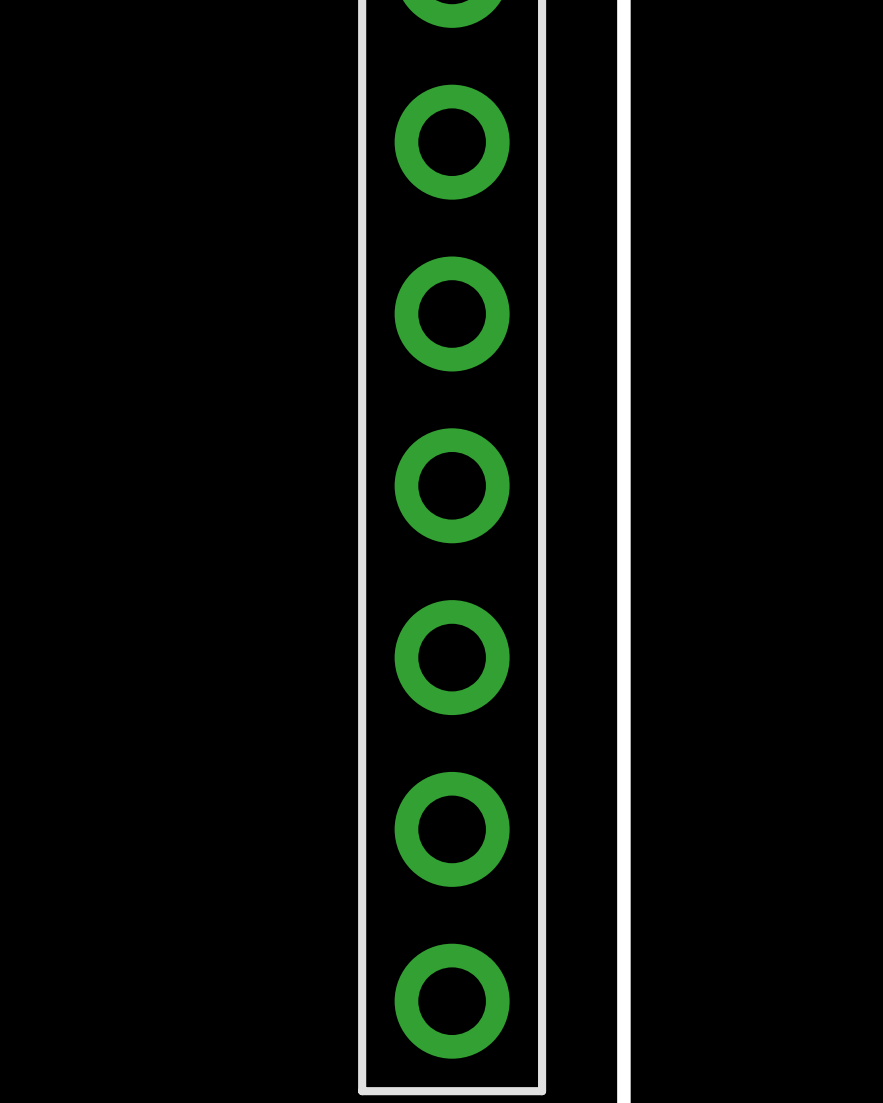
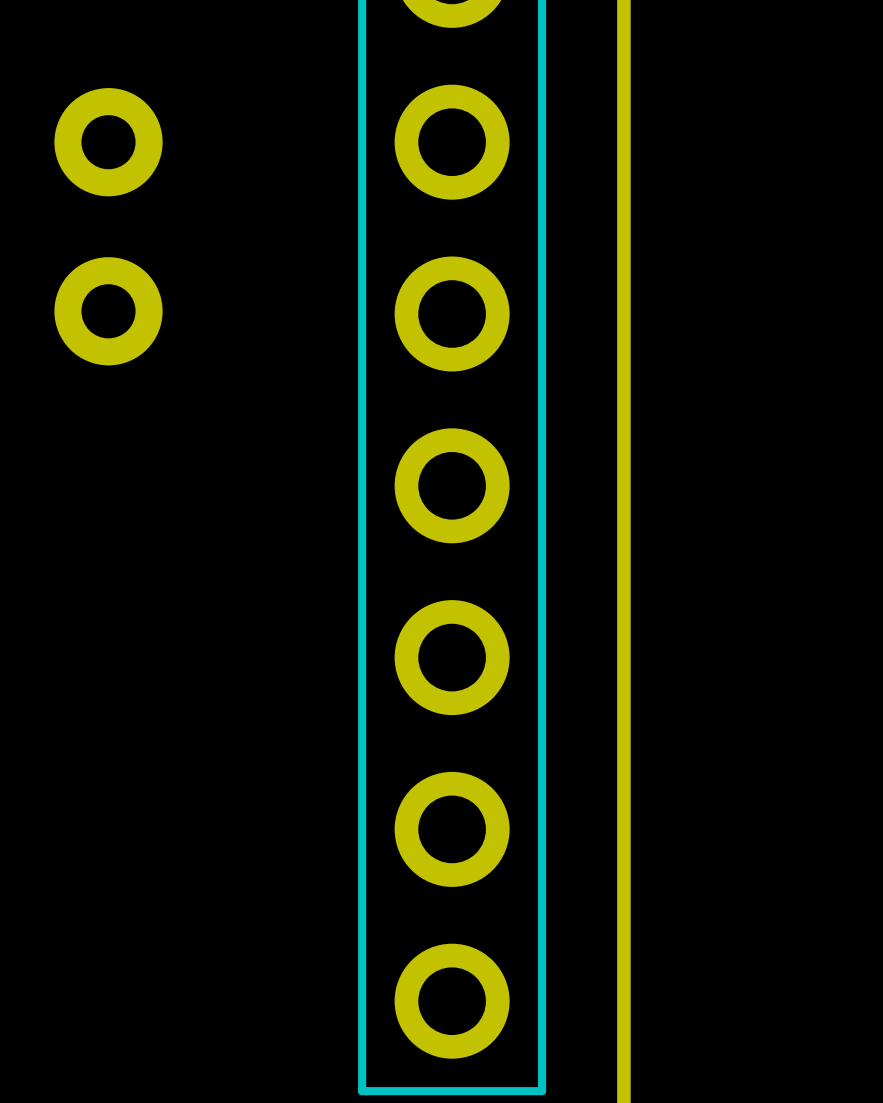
part: none -> (108, 226)

